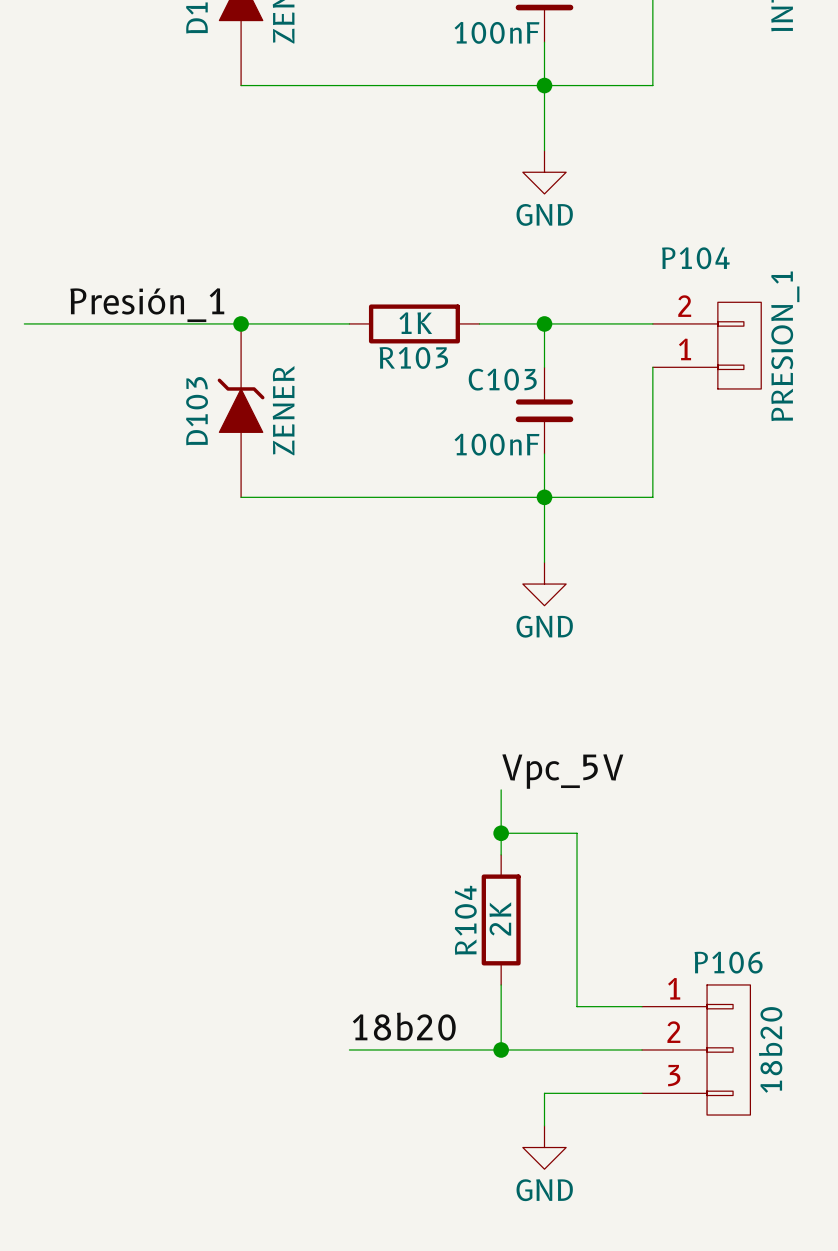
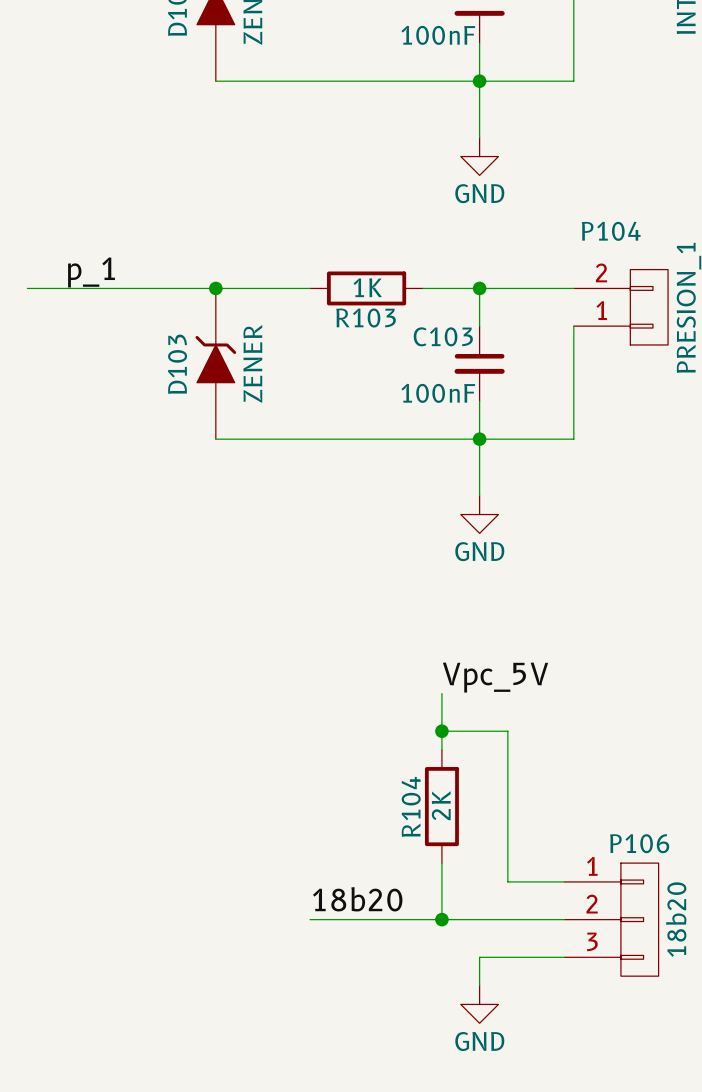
label: Presión_1 (147, 305) -> p_1 (91, 272)

